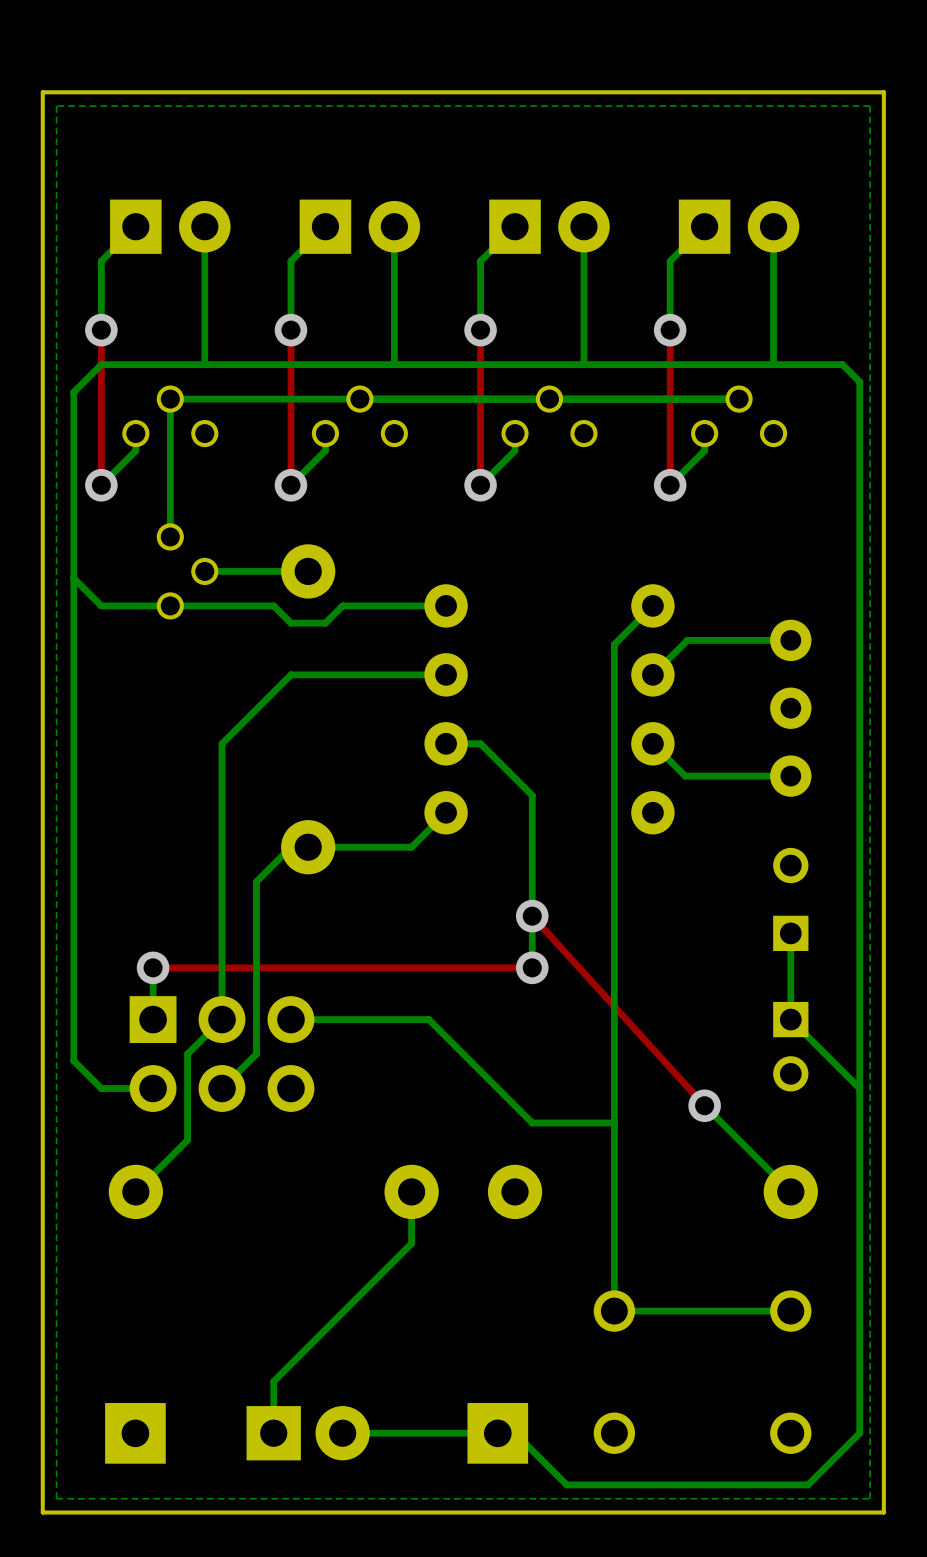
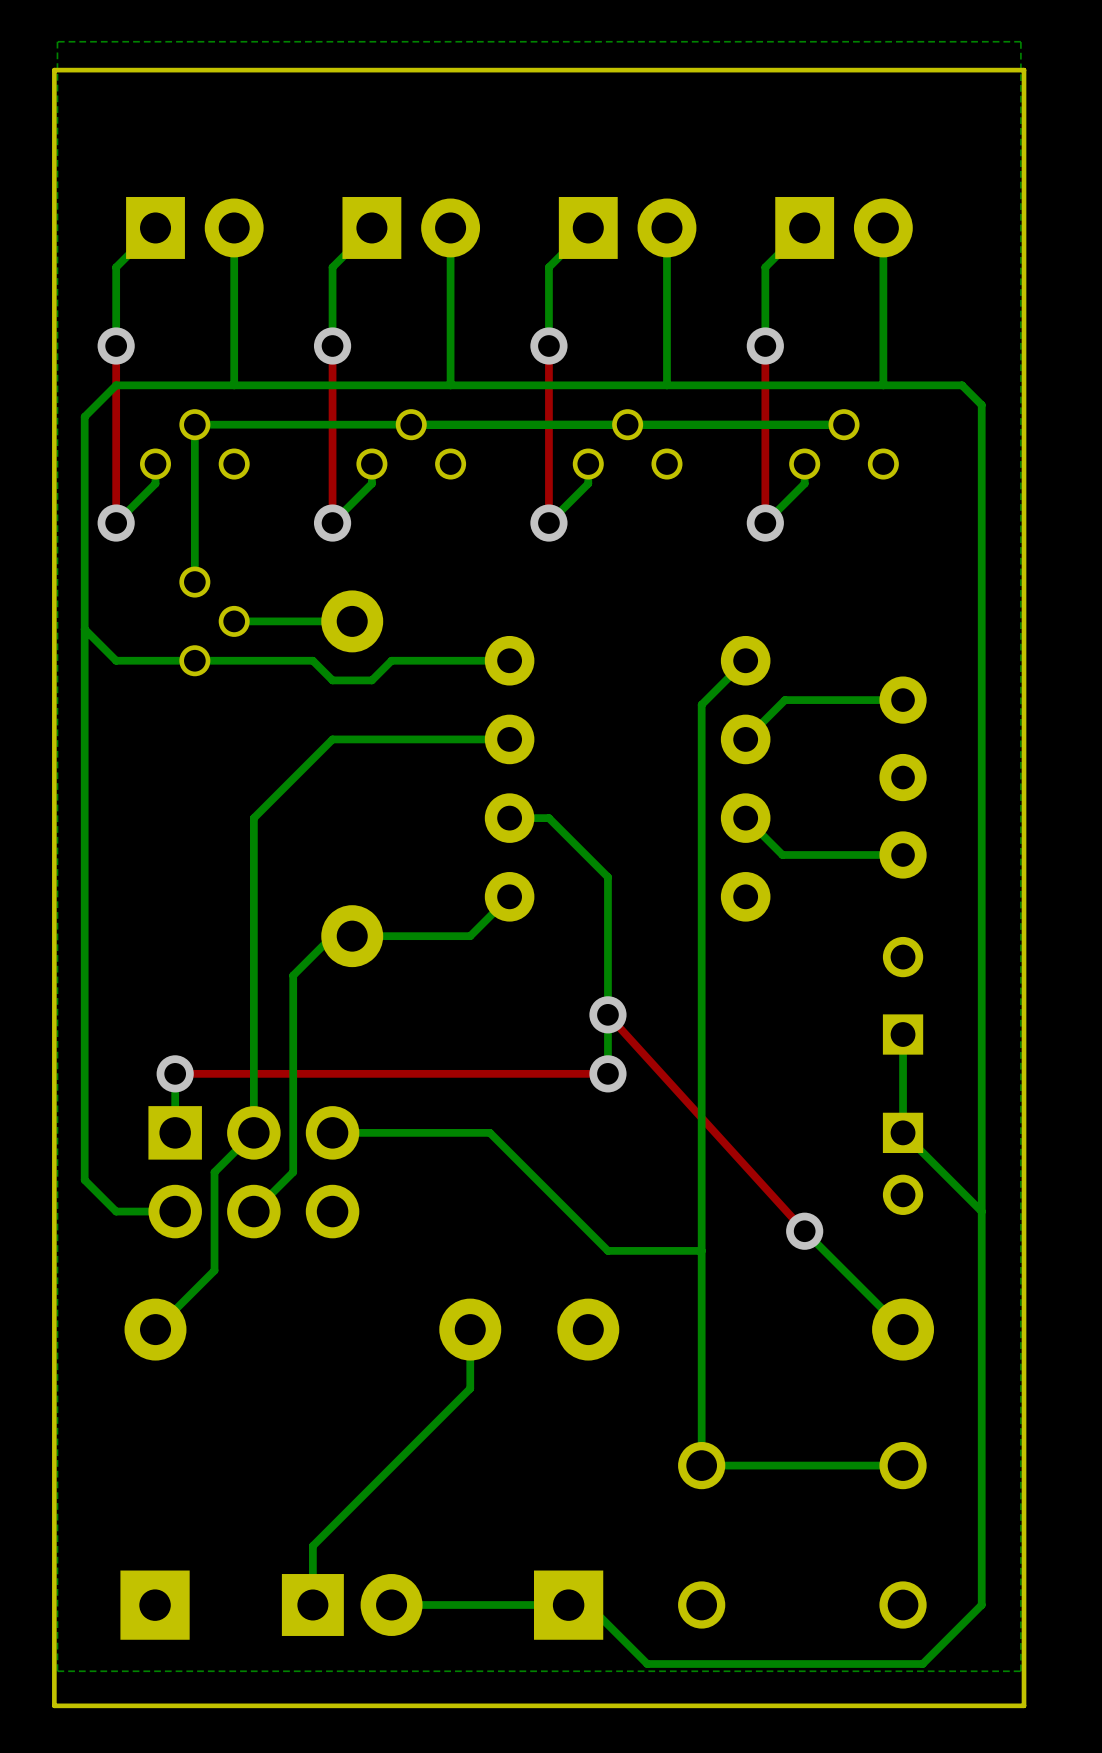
board edge: (883, 92) (42, 92) (42, 1512) (883, 1512) (883, 92) -> (1024, 70) (1024, 1705) (54, 1705) (54, 70) (1024, 70)
bottom zone outline: (870, 106) (870, 1498) (56, 1498) (56, 106) (870, 106) -> (1020, 41) (1020, 1671) (57, 1671) (57, 41) (1020, 41)

